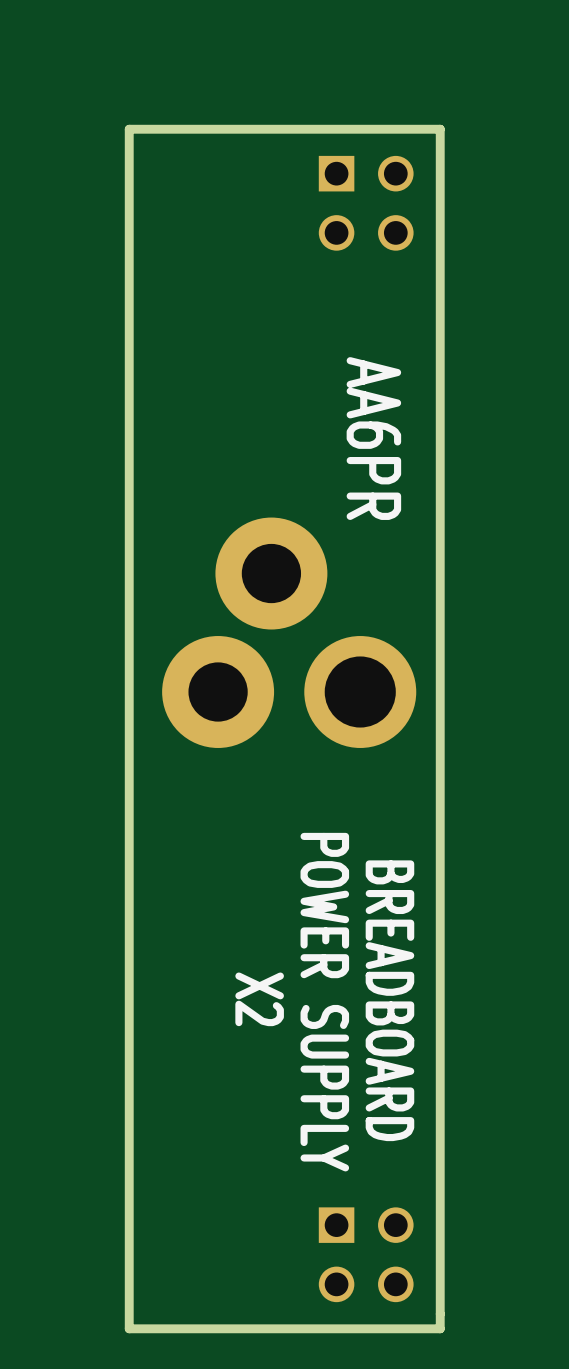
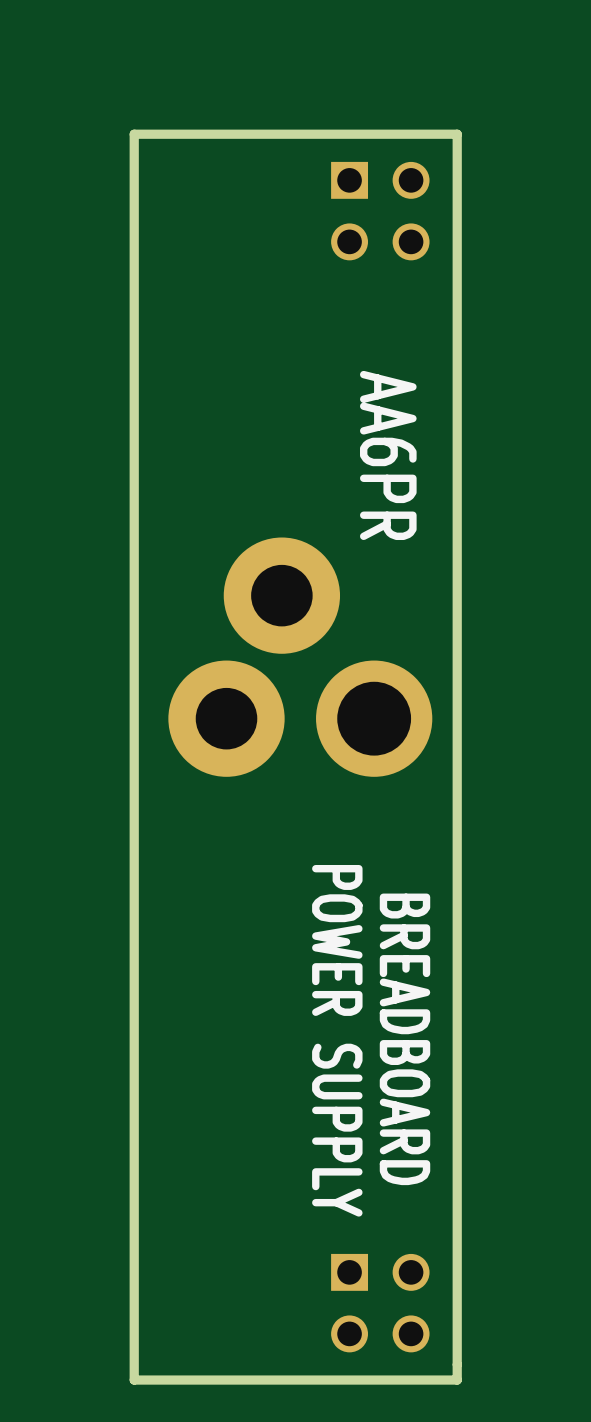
text: X2 (259, 999) -> none

